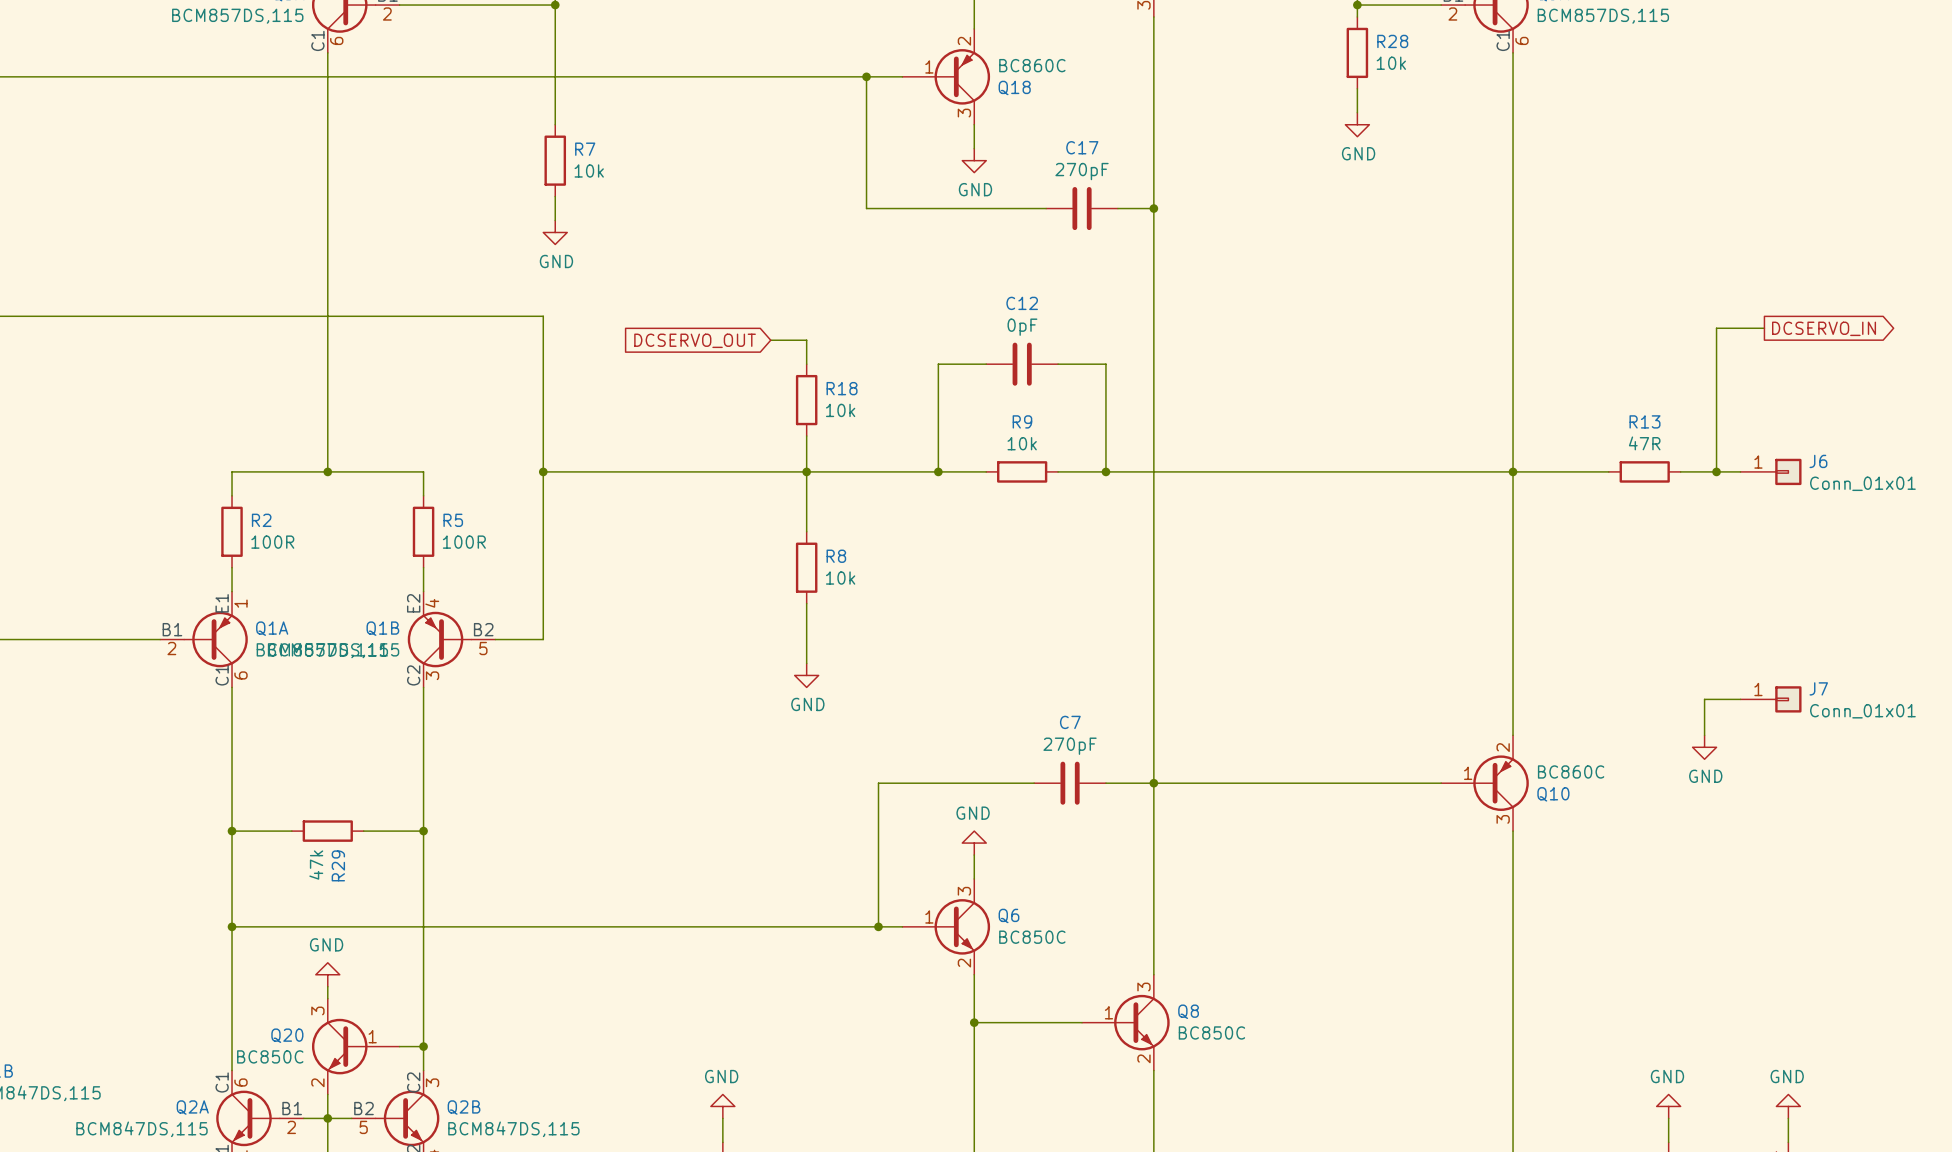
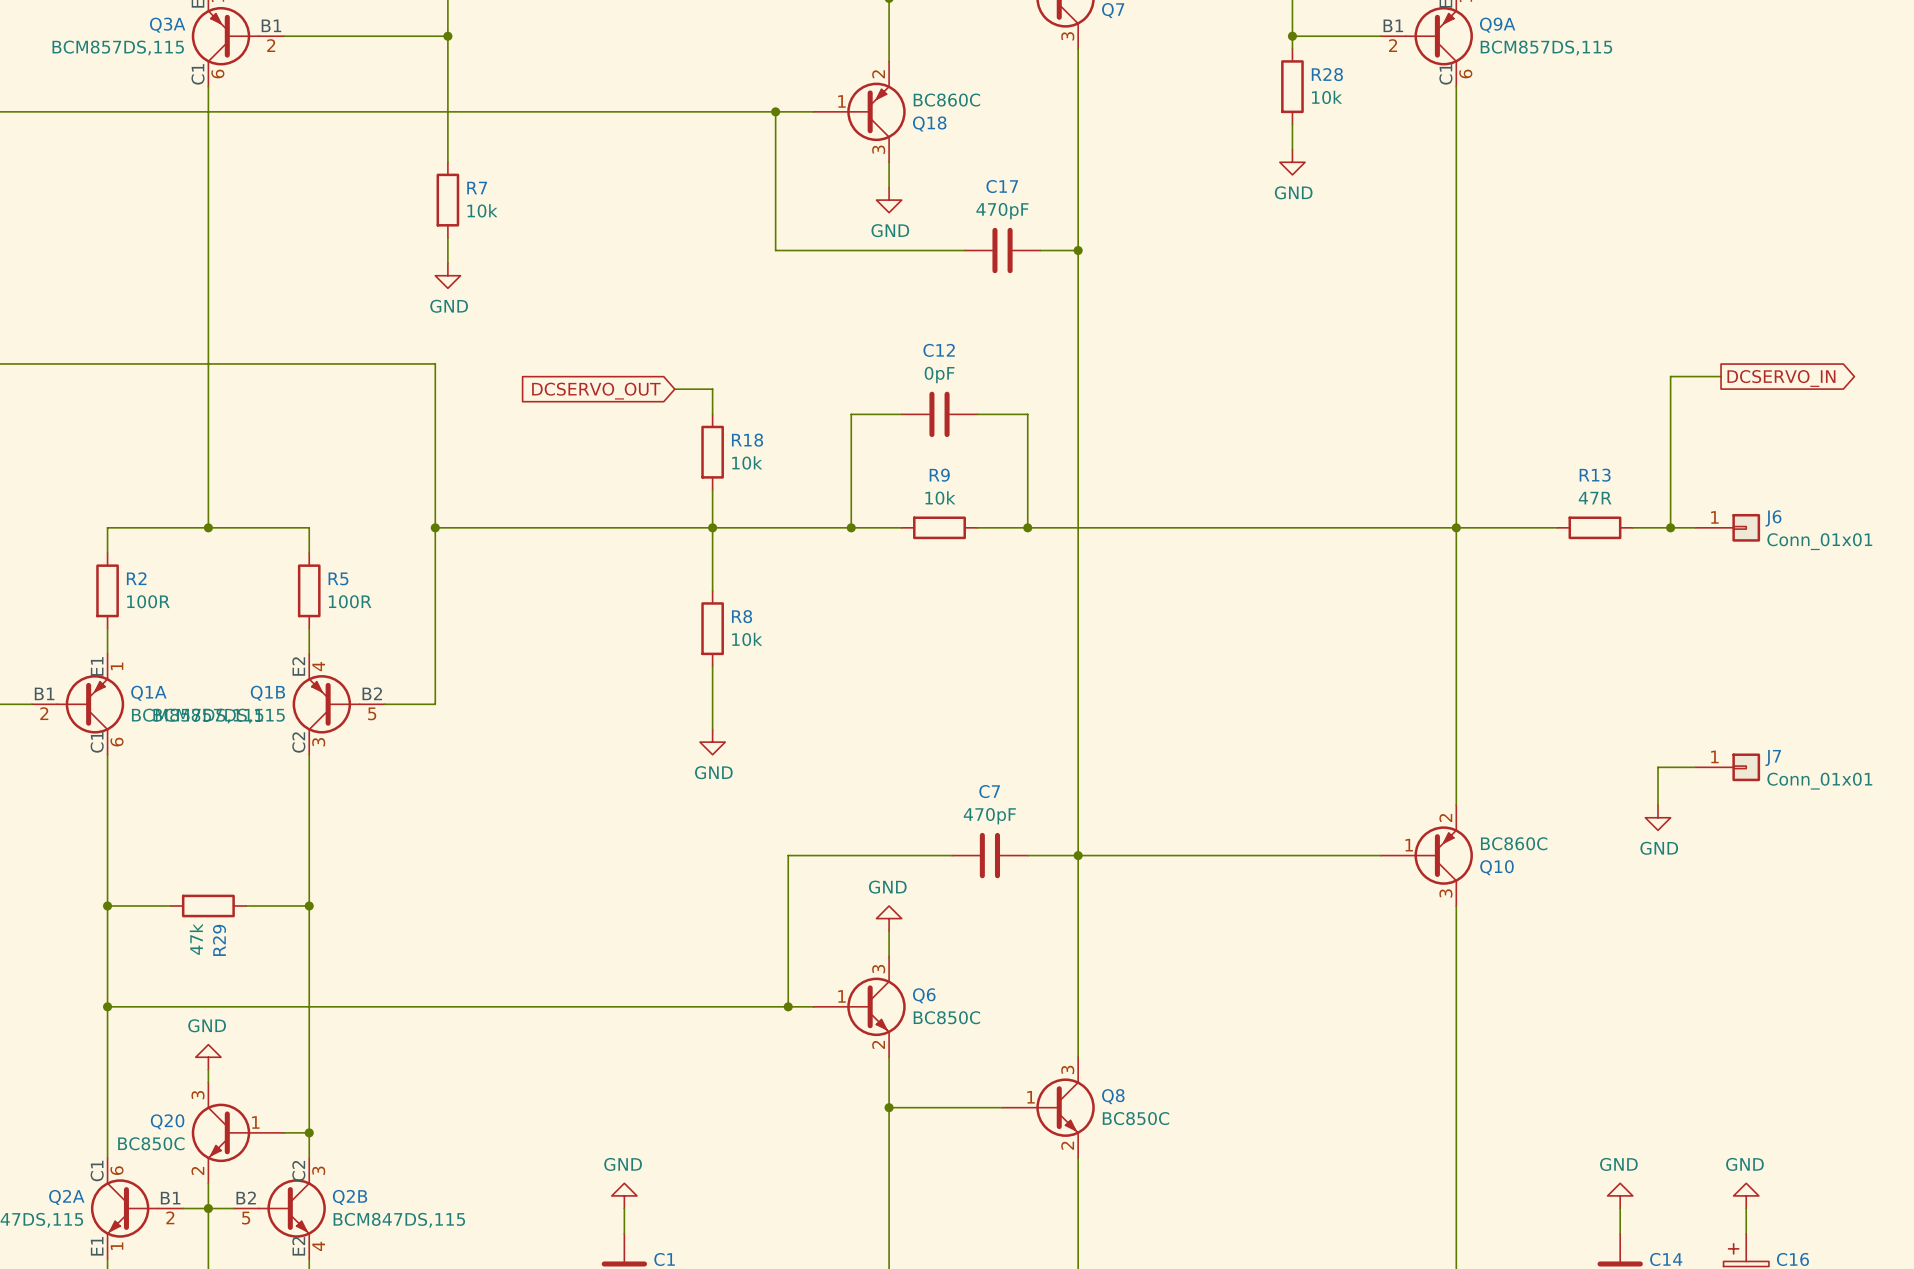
C17 value: 270pF (1082, 171) -> 470pF (1002, 211)
C7 value: 270pF (1070, 746) -> 470pF (989, 816)

